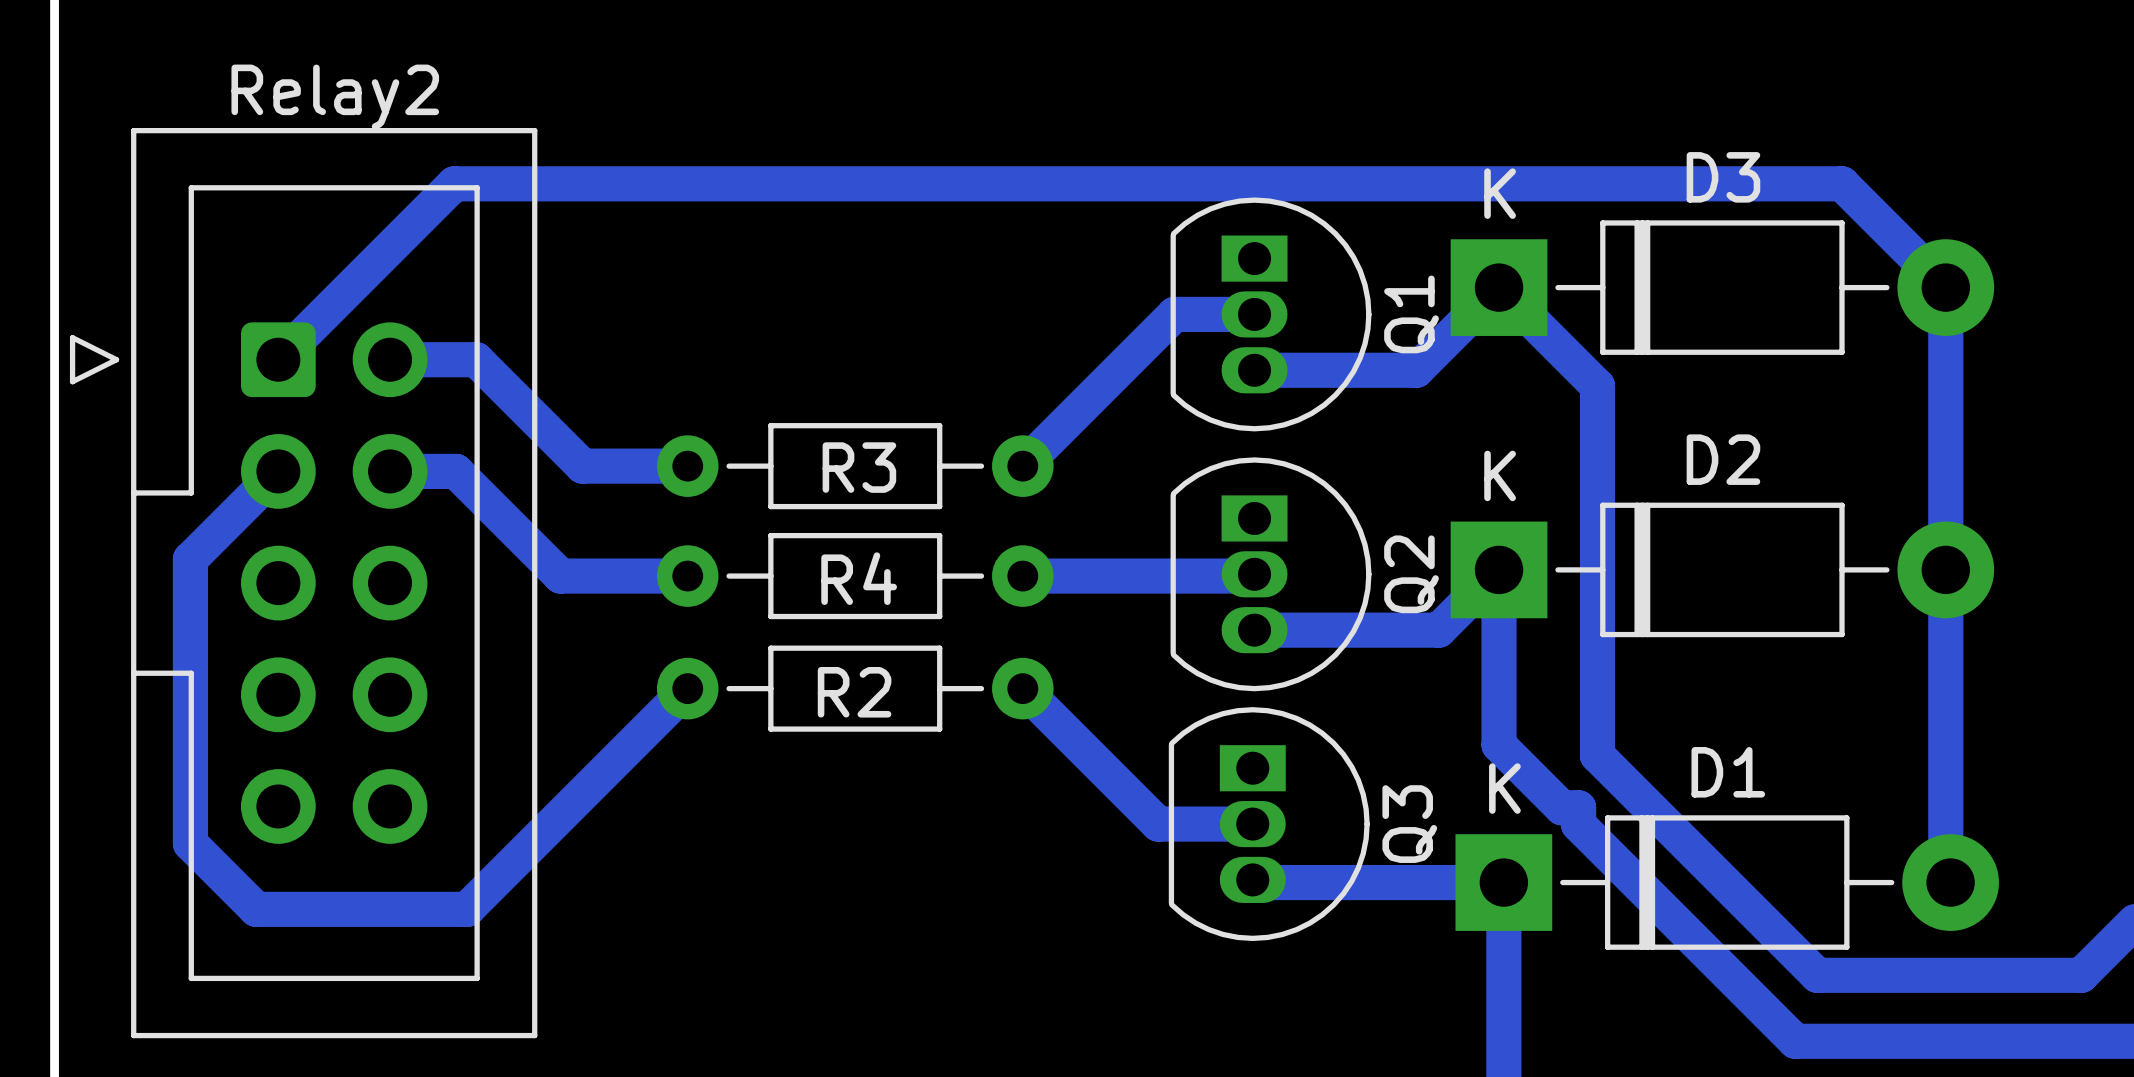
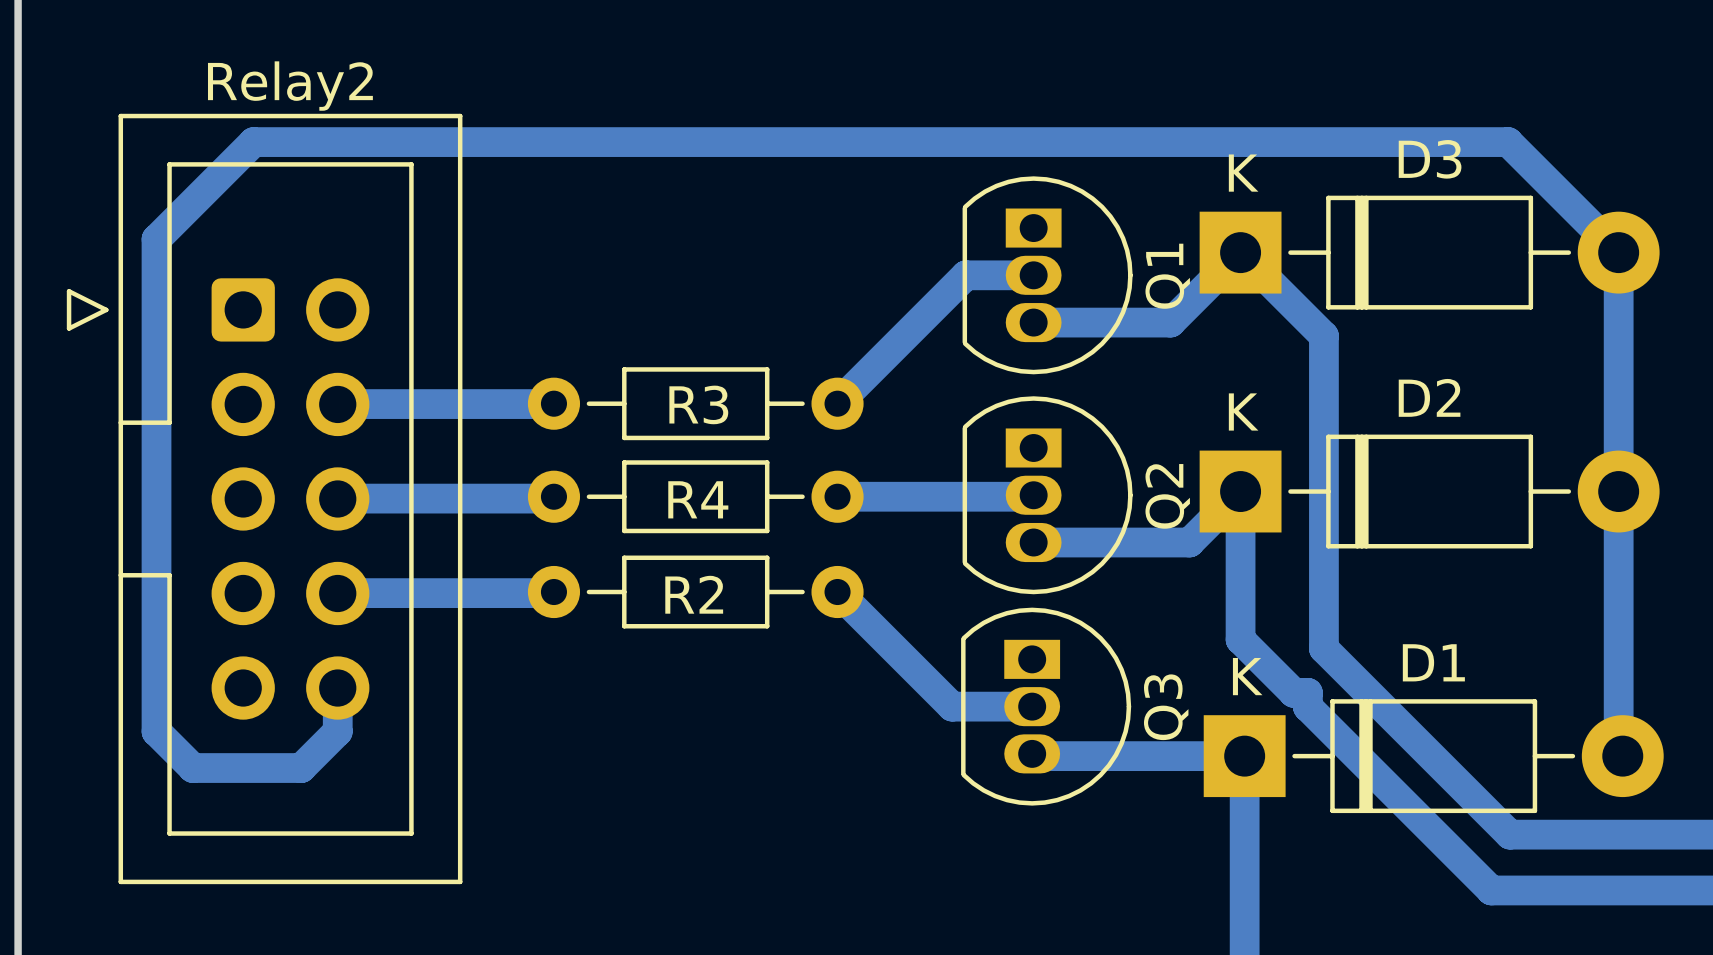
bottom track: (1842, 183) (454, 183) (278, 359) -> (1530, 164) (1508, 142) (253, 142) (156, 239) (156, 731) (192, 768) (301, 768) (337, 731) (337, 688)
bottom track: (390, 359) (476, 359) (582, 466) (687, 466) -> (338, 404) (553, 404)
bottom track: (278, 471) (190, 559) (190, 843) (256, 909) (467, 909) (686, 689) -> (338, 593) (552, 593)
bottom track: (390, 477) (390, 471) (456, 471) (560, 576) (687, 576) -> none
bottom track: none -> (338, 498) (552, 498)
Relay2 position: (303, 583) -> (264, 498)

